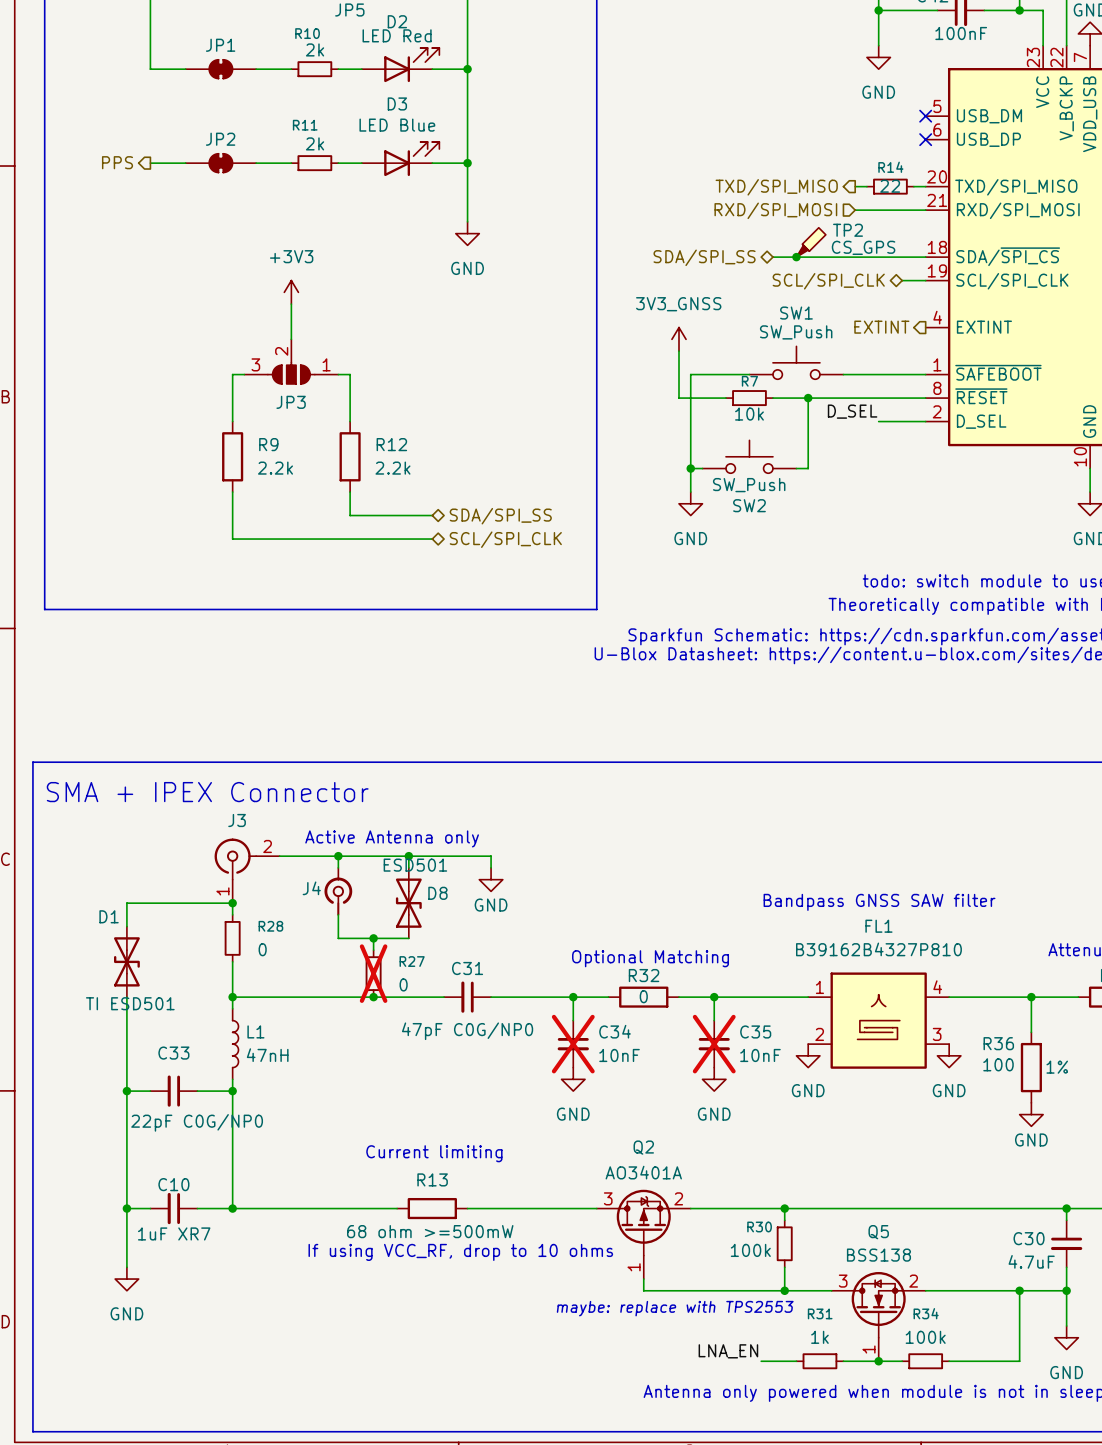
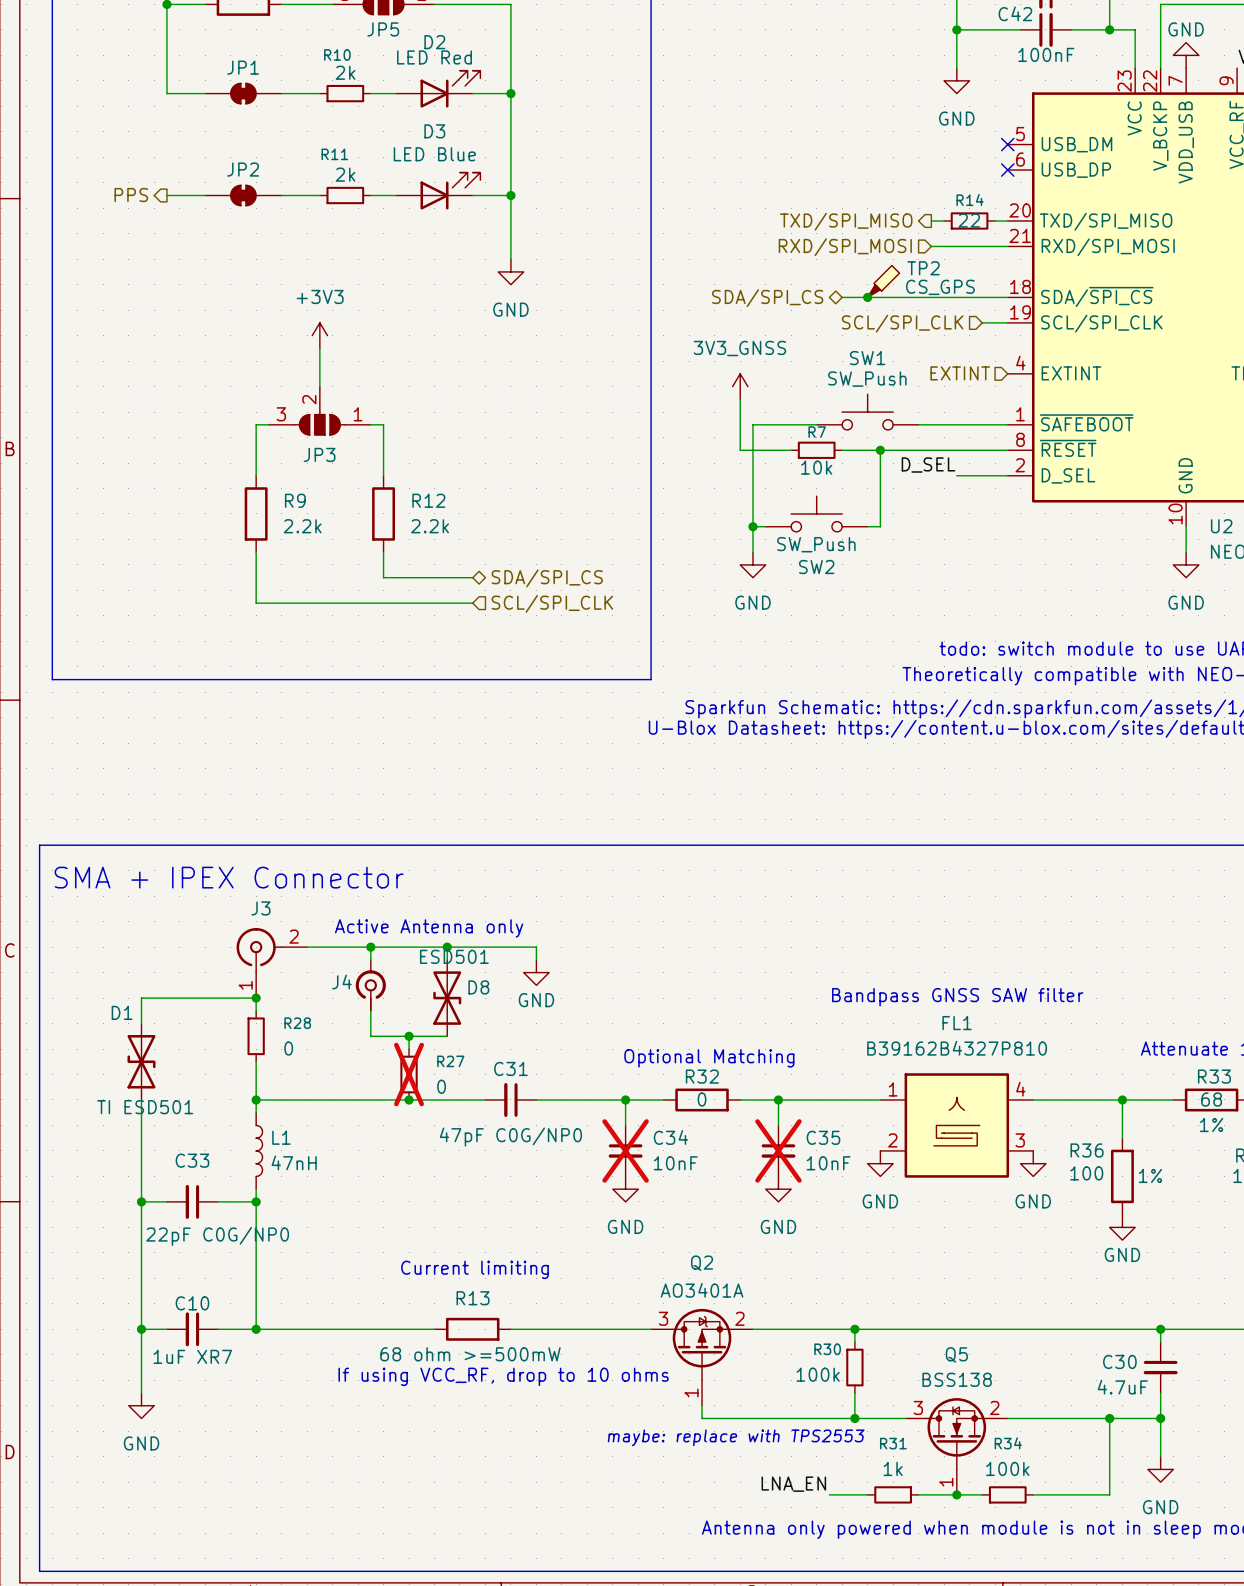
hierarchical label: SDA/SPI_SS (704, 257) -> SDA/SPI_CS (767, 298)
hierarchical label shape: bidirectional (828, 281) -> input (902, 323)
hierarchical label shape: output (881, 327) -> input (960, 373)
hierarchical label: SDA/SPI_SS (500, 516) -> SDA/SPI_CS (547, 578)
hierarchical label shape: bidirectional (505, 539) -> input (552, 603)

